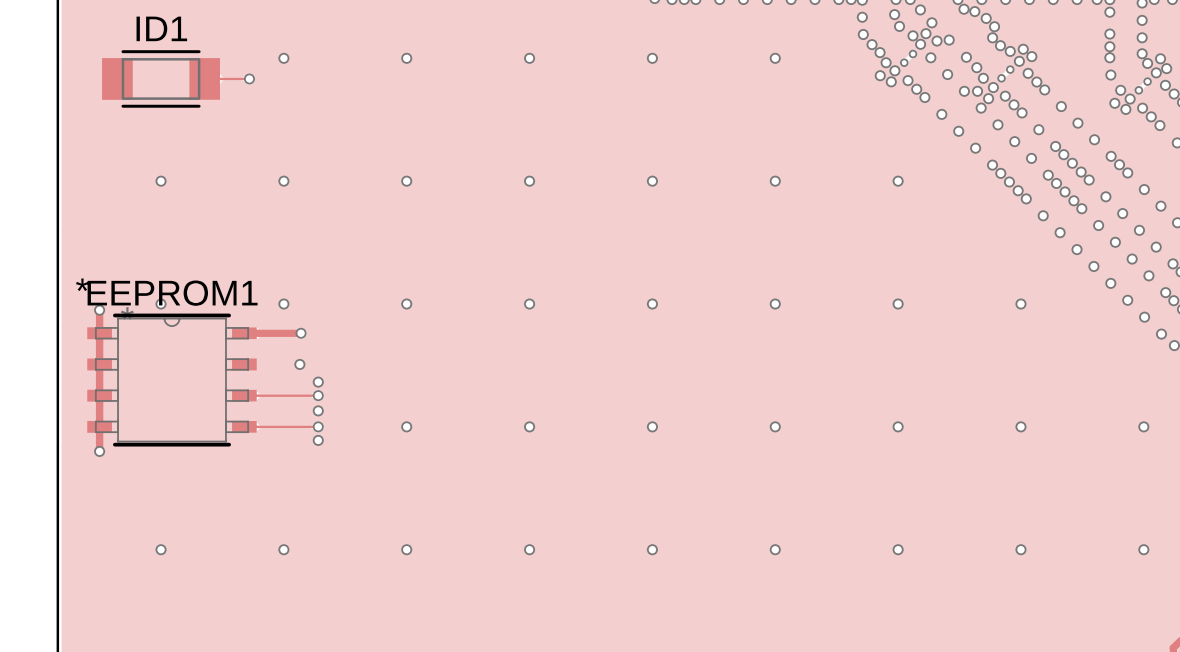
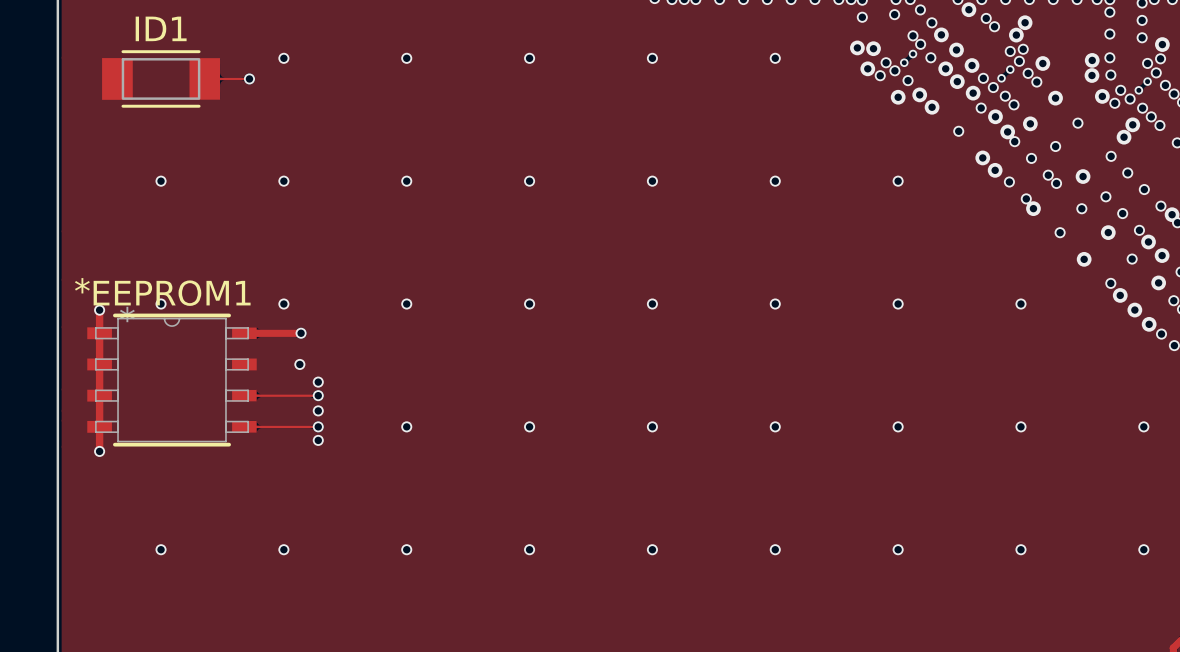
via: (964, 9) -> none
via: none -> (968, 9)
via: (974, 11) -> none
via: none -> (1025, 22)
via: (899, 26) -> none
via: (925, 33) -> none
via: (863, 34) -> none
via: none -> (941, 34)
via: none -> (1016, 35)
via: (992, 37) -> none
via: (949, 40) -> none
via: (937, 41) -> none
via: (872, 44) -> none
via: none -> (1162, 44)
via: (1000, 45) -> none
via: (1109, 46) -> none
via: none -> (857, 47)
via: none -> (873, 48)
via: none -> (956, 50)
via: (880, 52) -> none
via: (1142, 53) -> none
via position: (1031, 56) -> (1042, 63)
via: (966, 57) -> none
via: none -> (1092, 60)
via: none -> (972, 65)
via: (976, 67) -> none
via: none -> (867, 68)
via: none -> (945, 68)
via: (1166, 68) -> none
via: (947, 74) -> none
via: none -> (1091, 75)
via: (891, 81) -> none
via: none -> (957, 81)
via: (916, 89) -> none
via: (1044, 89) -> none
via: (964, 91) -> none
via: (977, 91) -> none
via: none -> (973, 93)
via: none -> (919, 94)
via: none -> (1102, 96)
via: none -> (898, 97)
via: (924, 97) -> none
via: (988, 98) -> none
via: none -> (1055, 98)
via: (1061, 106) -> none
via: none -> (932, 107)
via: (1125, 109) -> none
via: (1022, 112) -> none
via: (941, 114) -> none
via: none -> (995, 116)
via: none -> (1030, 123)
via: (997, 124) -> none
via: none -> (1132, 124)
via: (1038, 129) -> none
via: none -> (1007, 131)
via: none -> (1124, 137)
via: (1094, 139) -> none
via: (975, 148) -> none
via: (1063, 154) -> none
via: none -> (982, 157)
via: (1072, 163) -> none
via: (1119, 164) -> none
via: (992, 165) -> none
via: none -> (995, 170)
via: (1081, 172) -> none
via: (1000, 173) -> none
via: none -> (1083, 176)
via: (1089, 180) -> none
via: (1018, 190) -> none
via: (1065, 191) -> none
via: (1073, 200) -> none
via: none -> (1172, 214)
via position: (1043, 215) -> (1033, 208)
via: (1098, 225) -> none
via: none -> (1108, 232)
via: none -> (1148, 241)
via: (1115, 242) -> none
via: (1156, 247) -> none
via: (1077, 249) -> none
via: none -> (1162, 255)
via: none -> (1084, 259)
via: (1173, 263) -> none
via: (1093, 266) -> none
via: (1148, 275) -> none
via: none -> (1158, 282)
via: (1165, 292) -> none
via: none -> (1120, 295)
via: (1127, 300) -> none
via: none -> (1134, 310)
via: (1144, 317) -> none
via: none -> (1149, 324)

